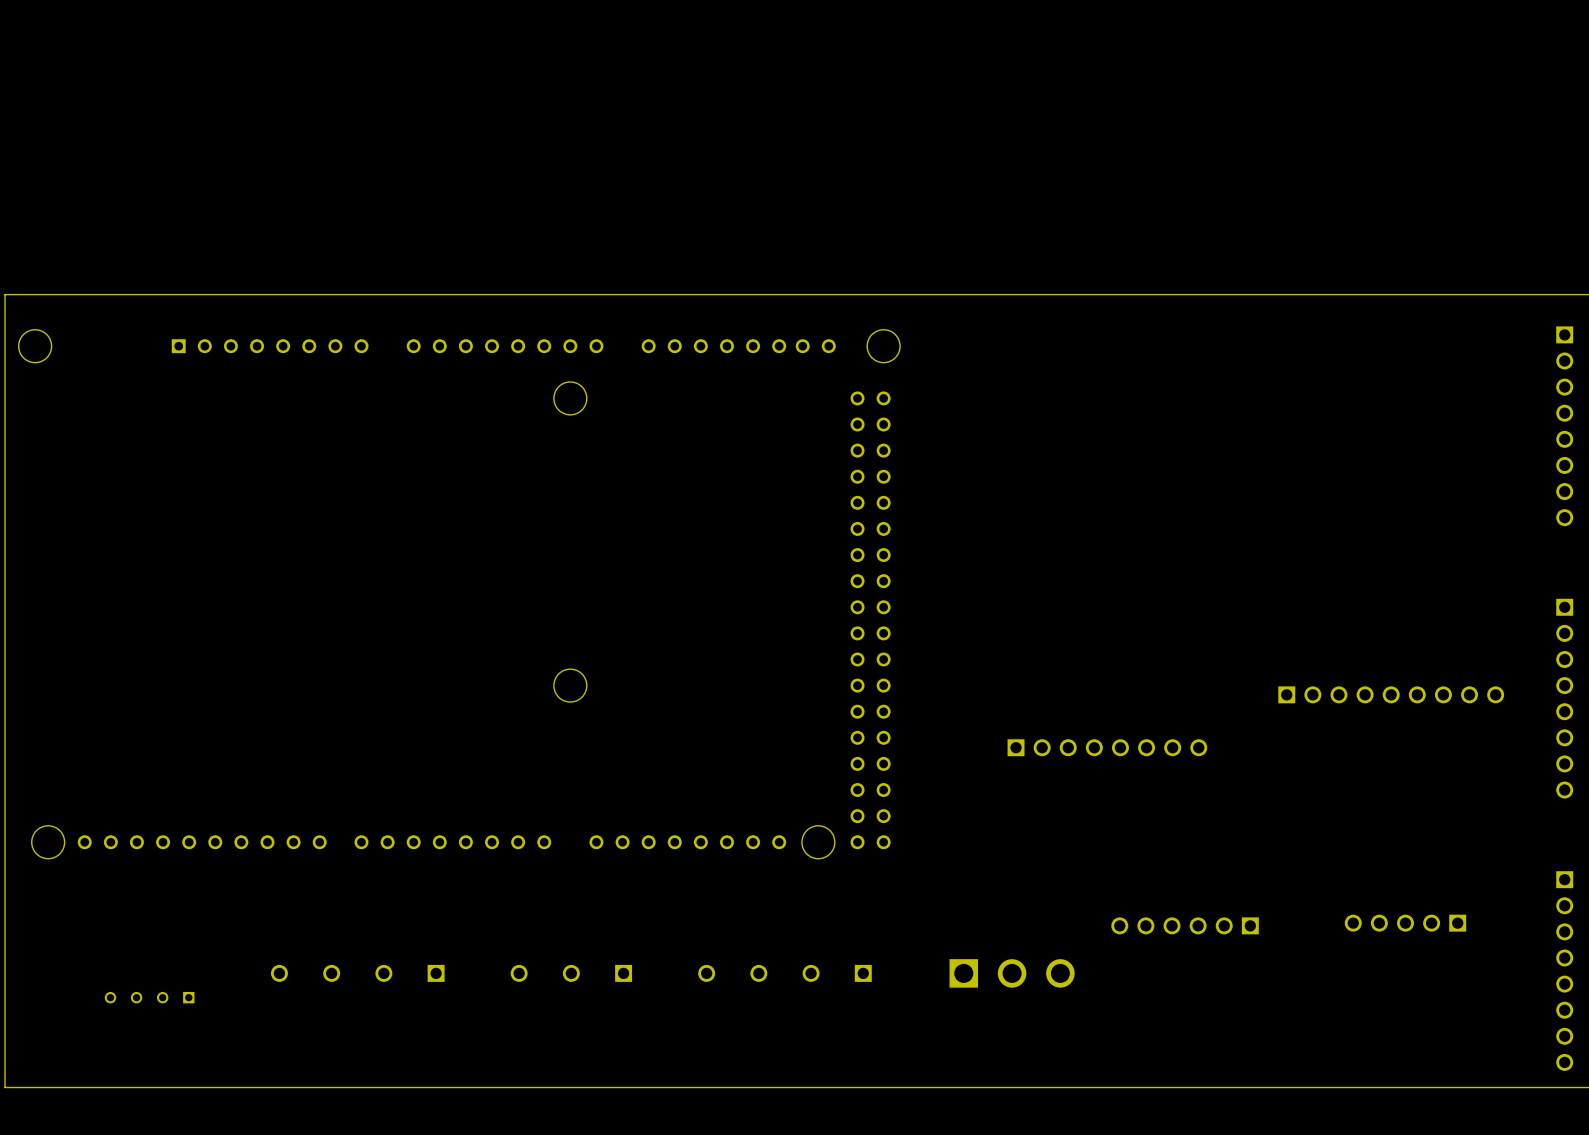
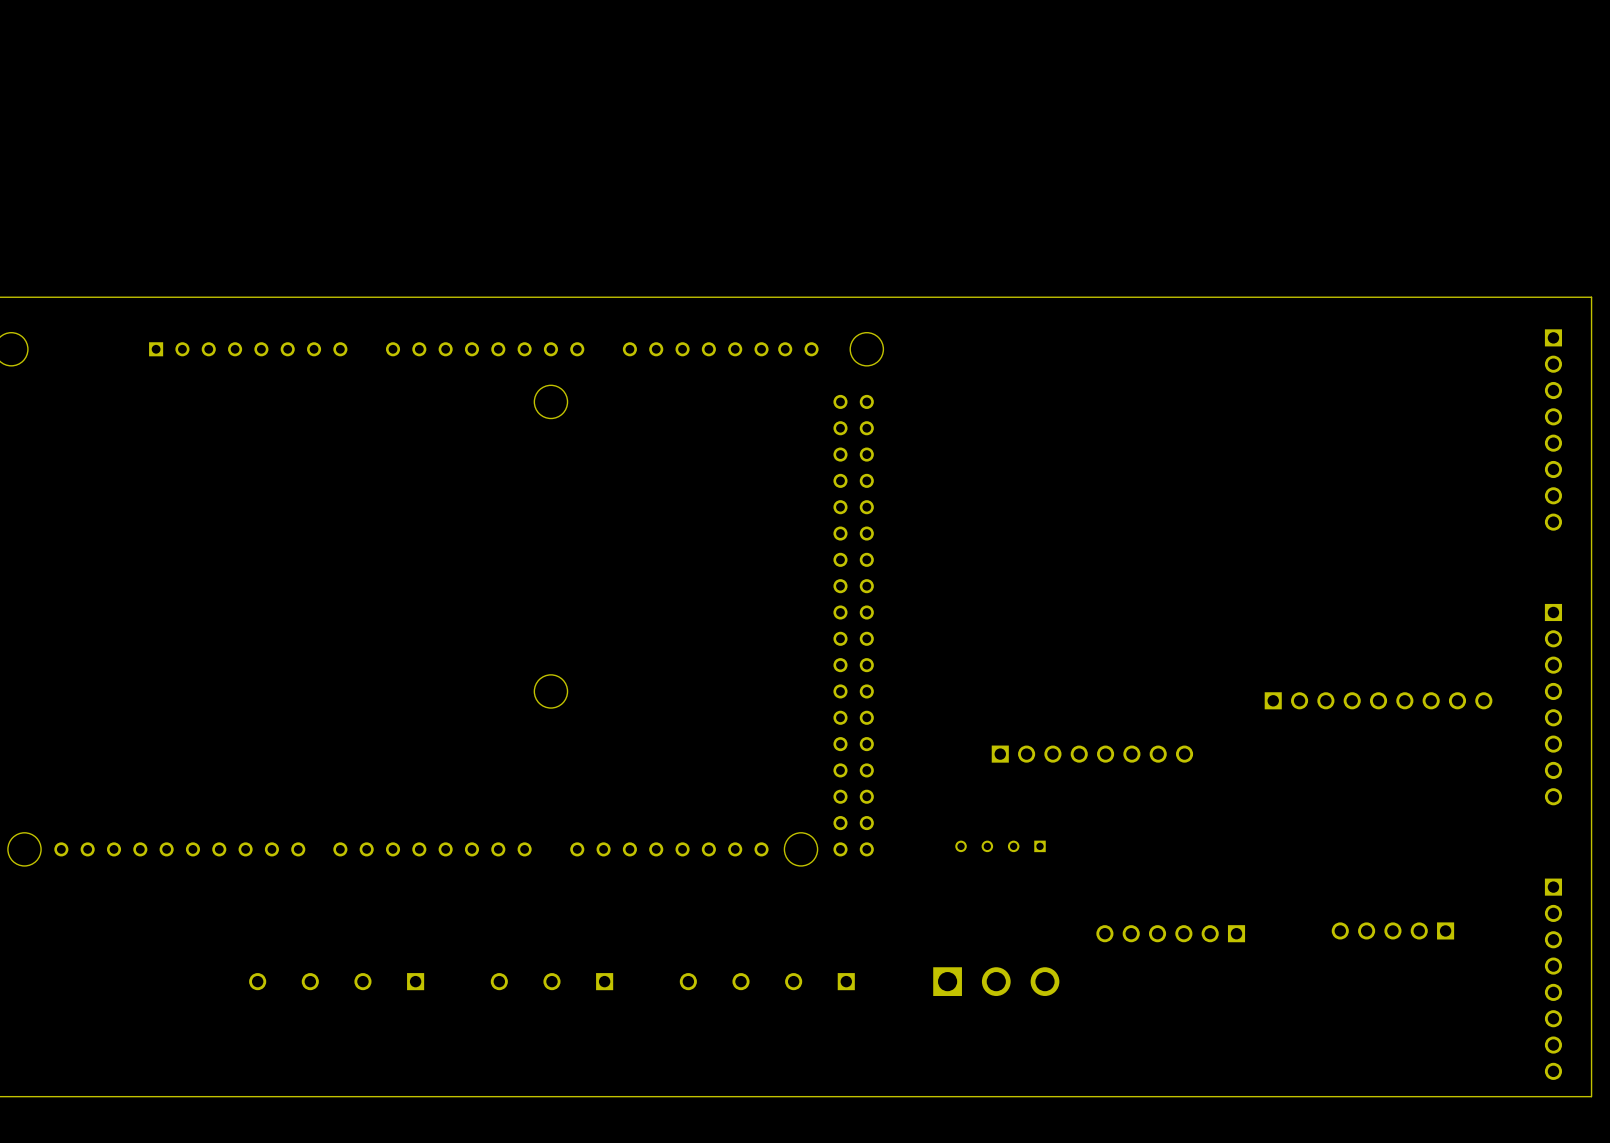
part: none -> (1000, 846)
part: (149, 997) -> none

